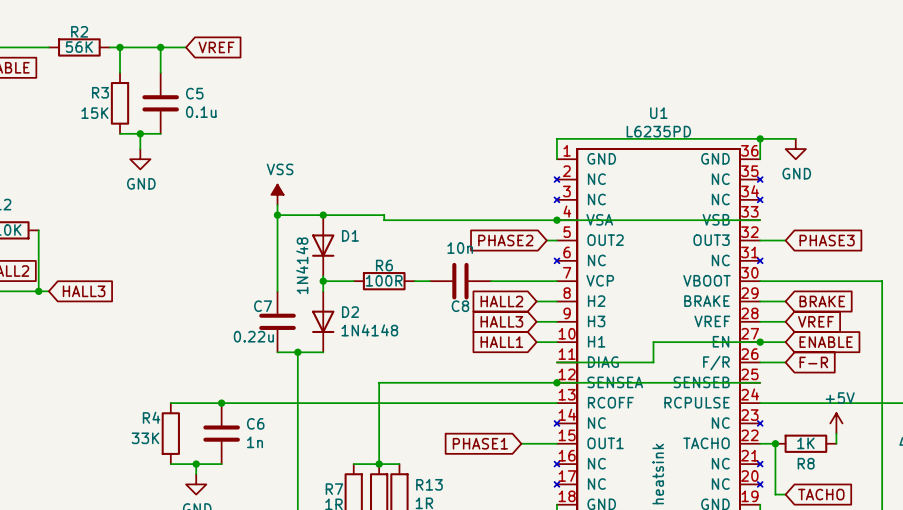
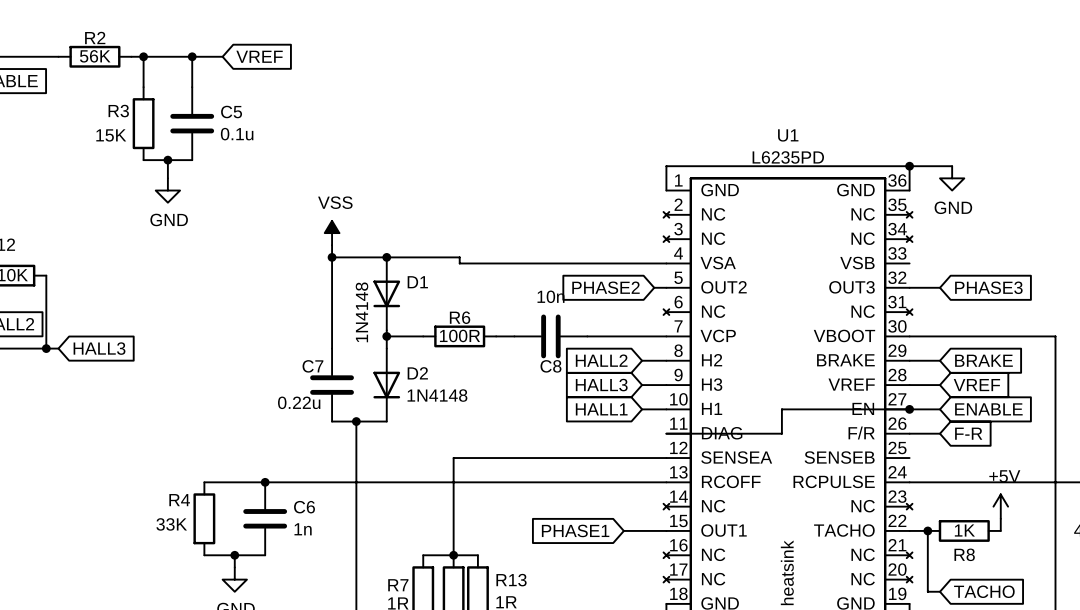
wire: (556, 220) (760, 220) -> none
junction: (556, 220) -> none
wire: (556, 382) (760, 382) -> none
junction: (556, 382) -> none

